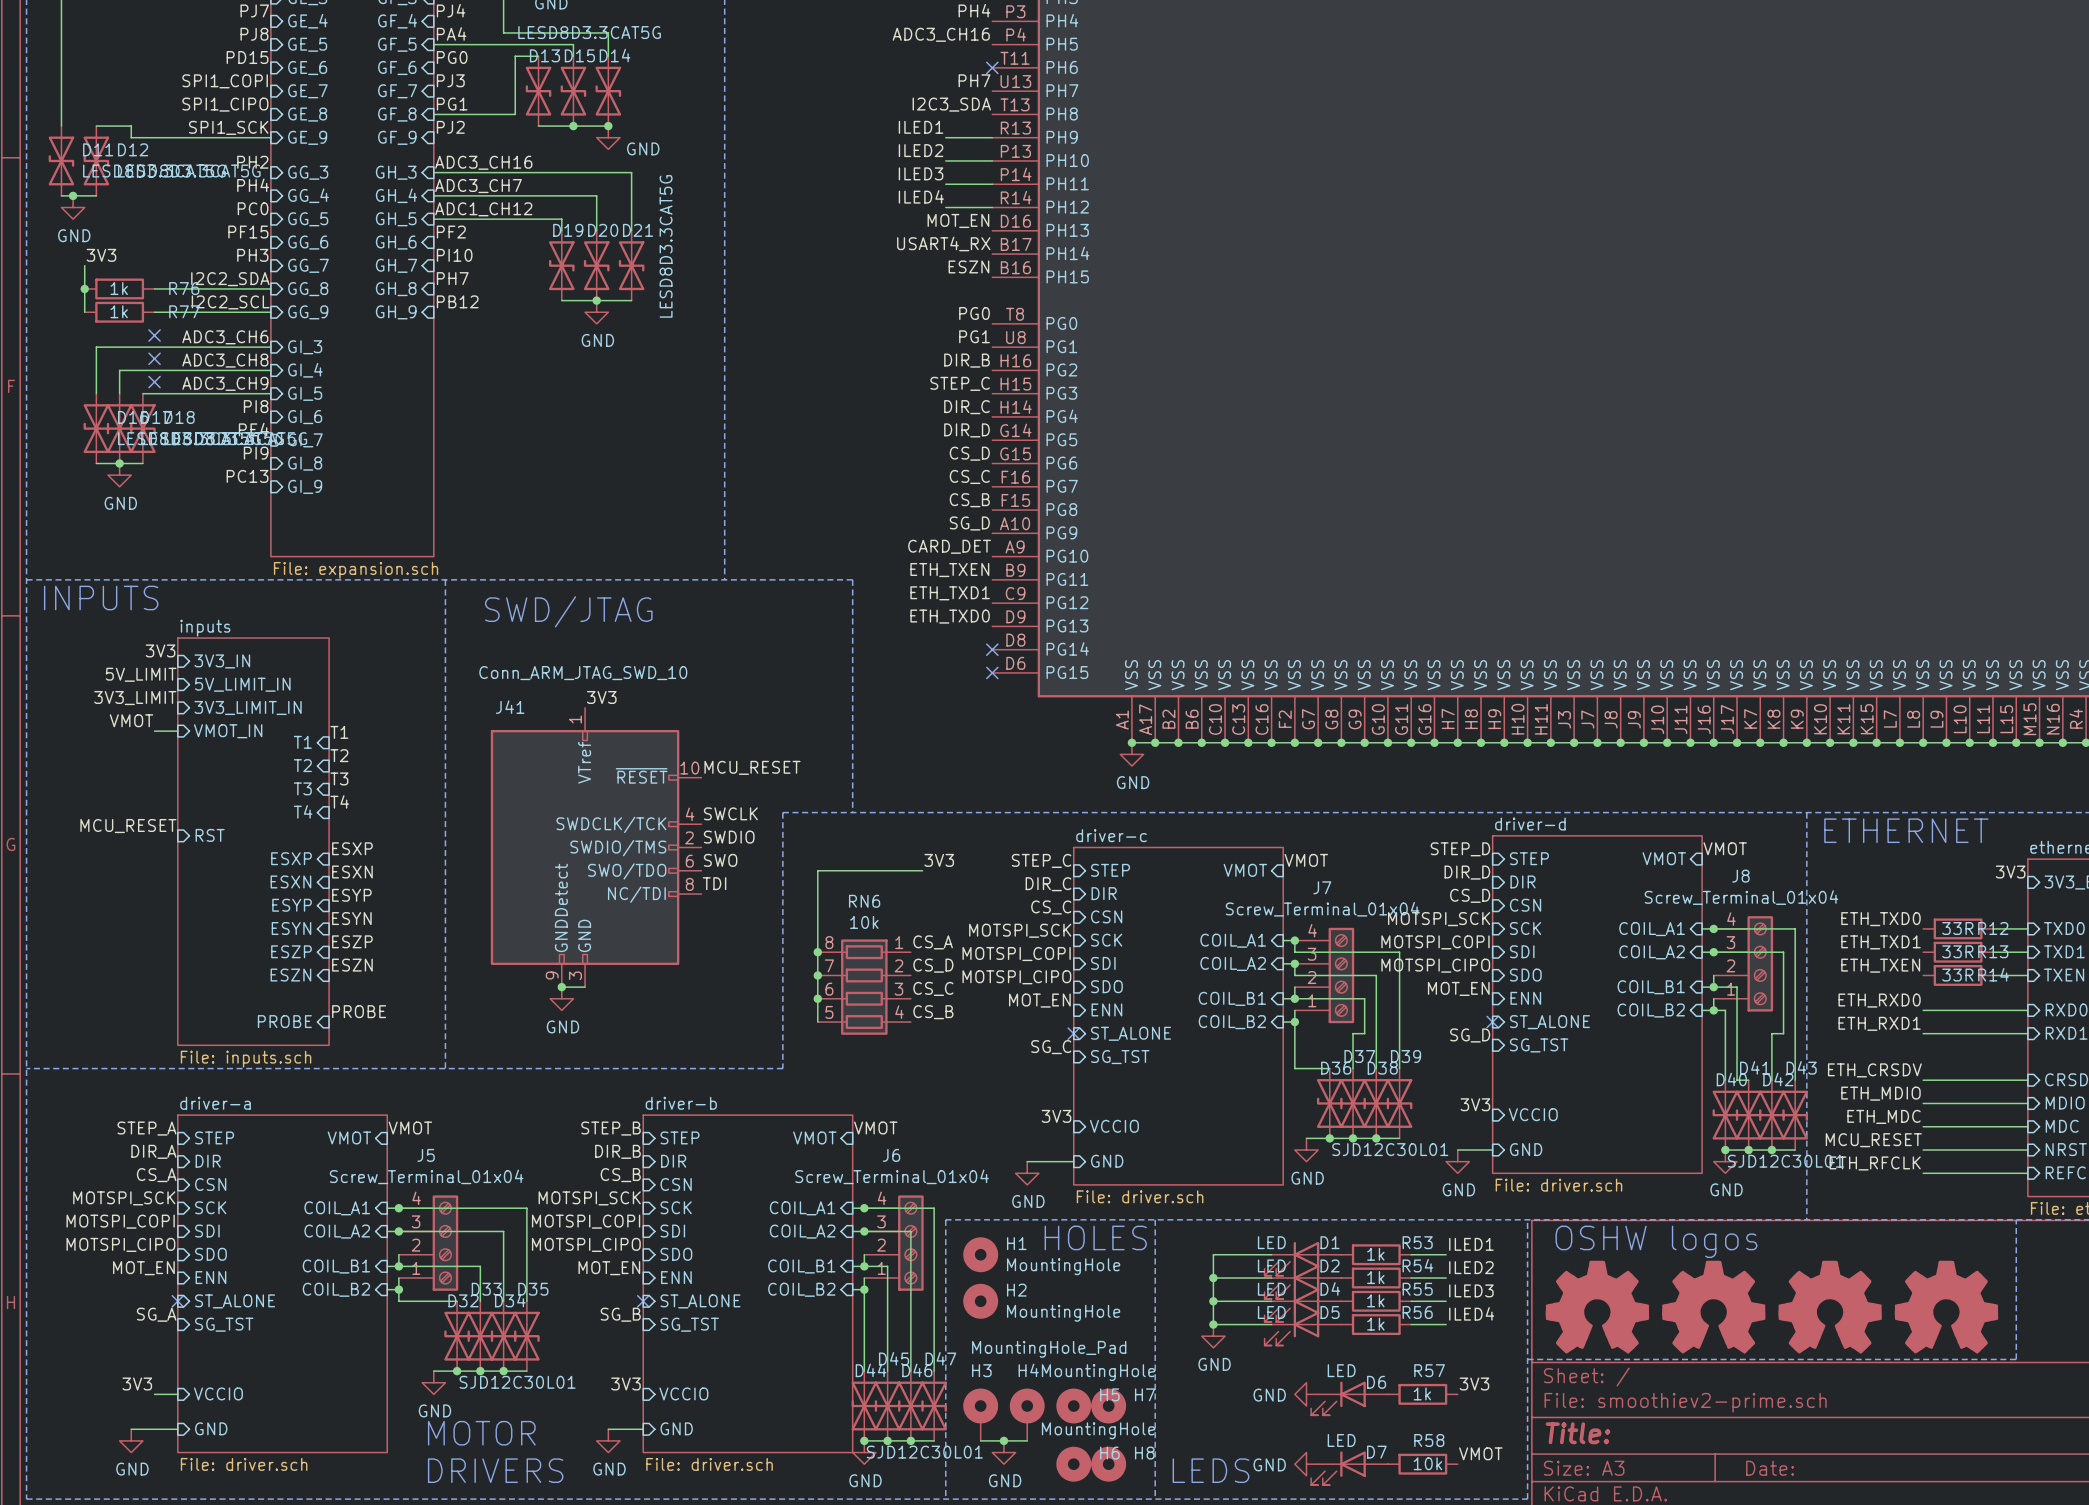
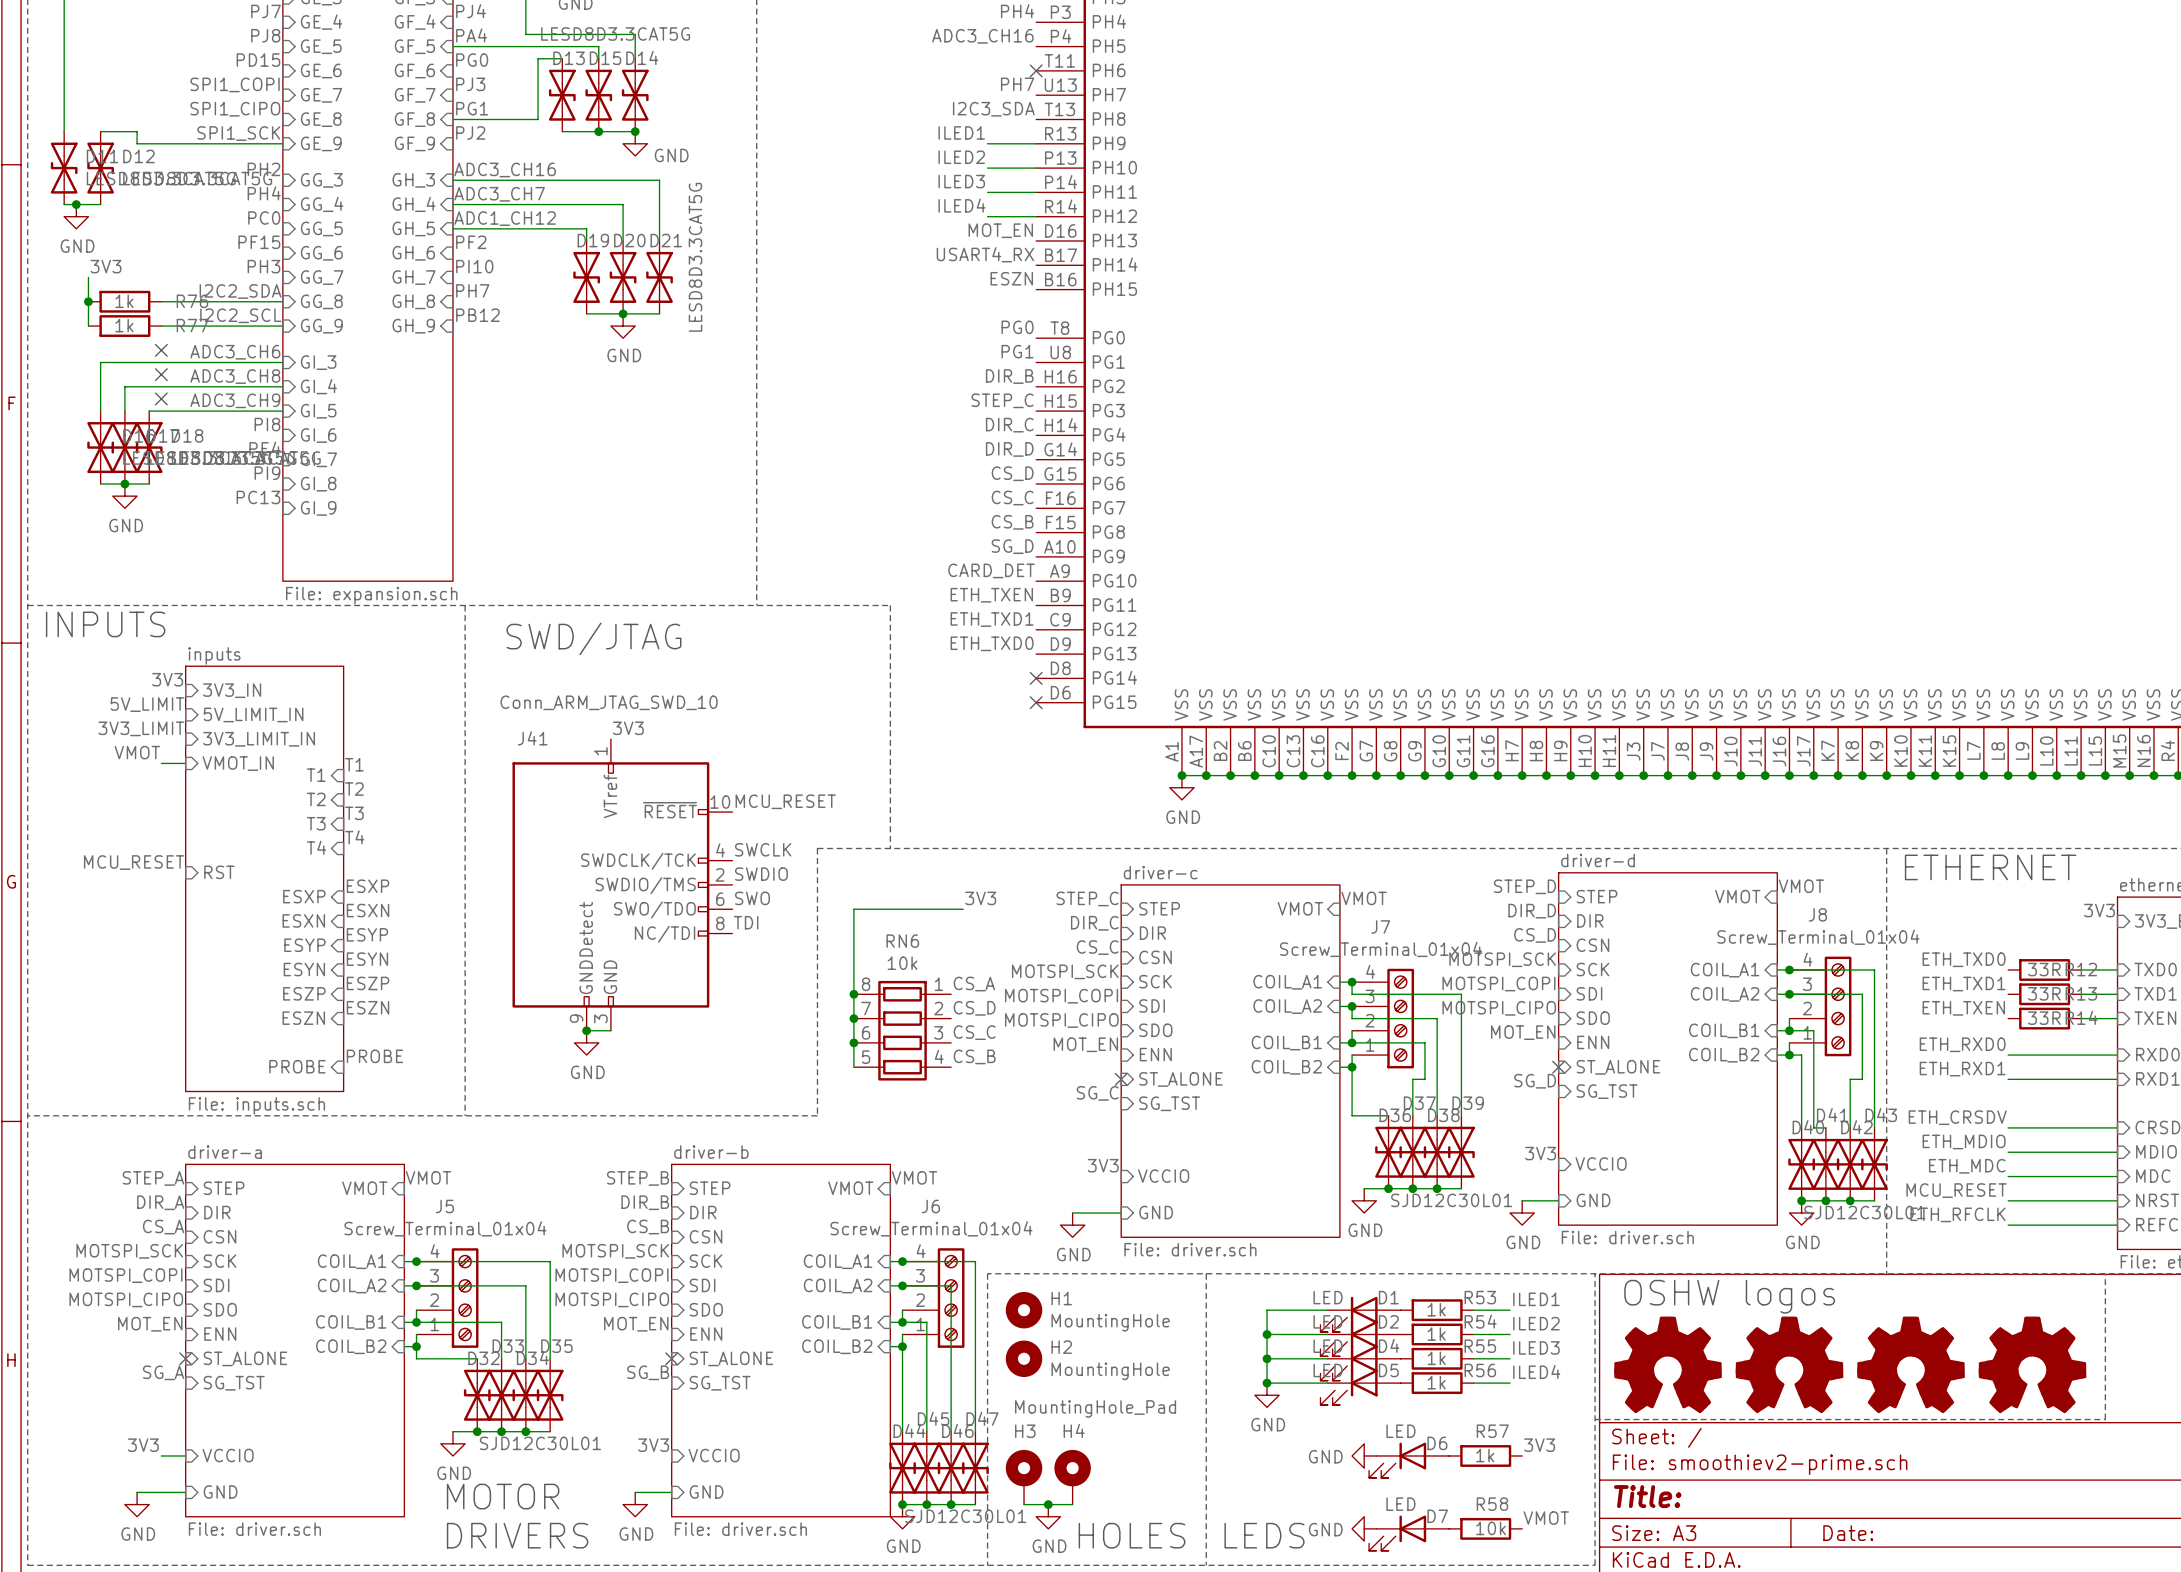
text: HOLES (1095, 1237) -> none
H5: MountingHole (1073, 1406) -> none
H7: (1108, 1406) -> none
H6: MountingHole (1073, 1464) -> none
H8: (1108, 1464) -> none
text: none -> HOLES (1132, 1535)

